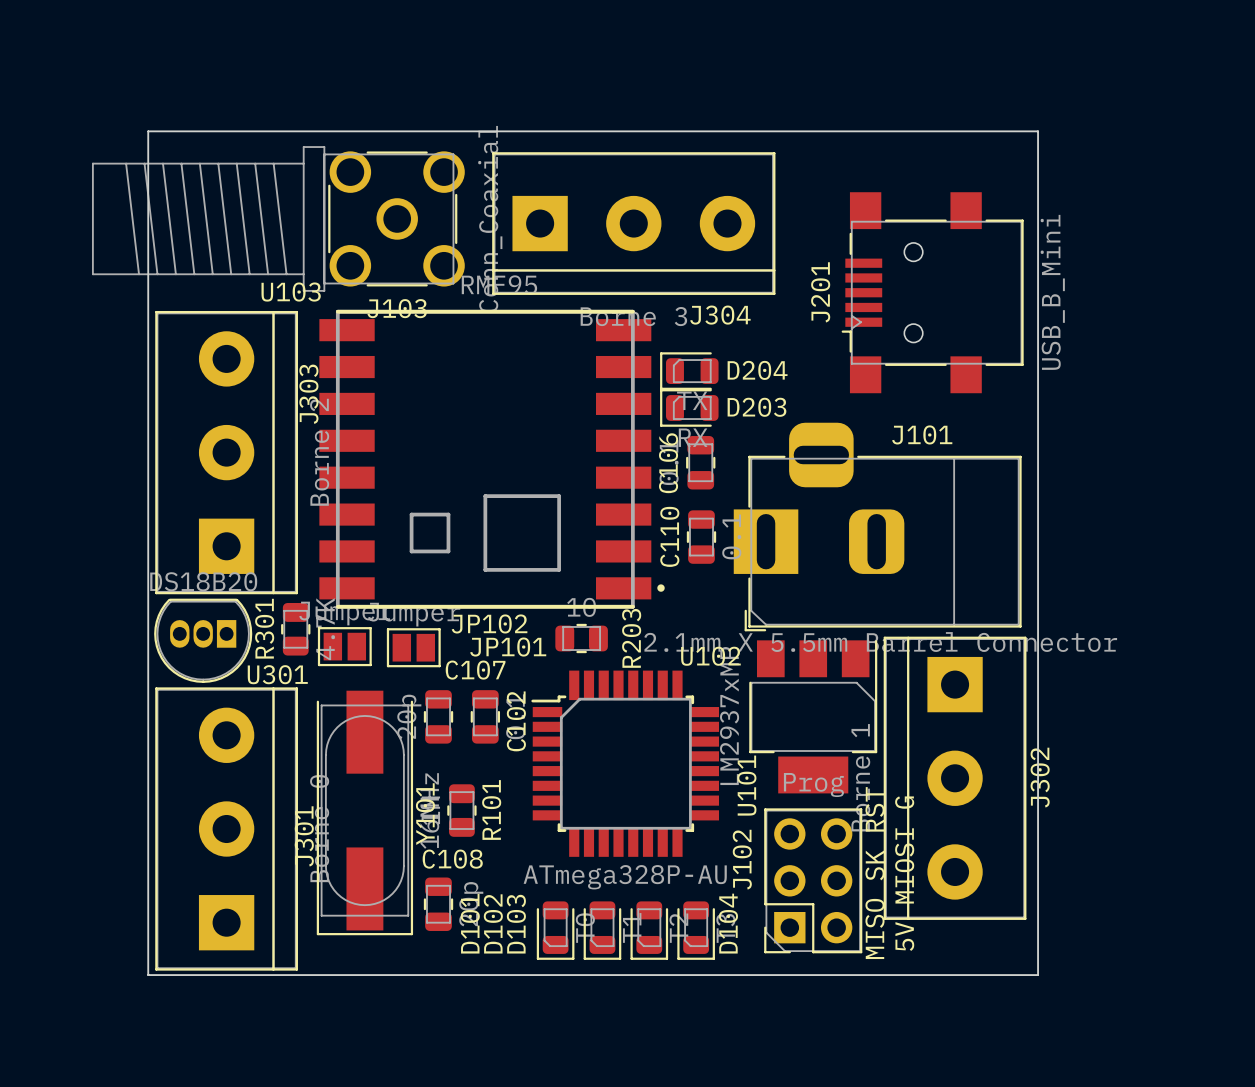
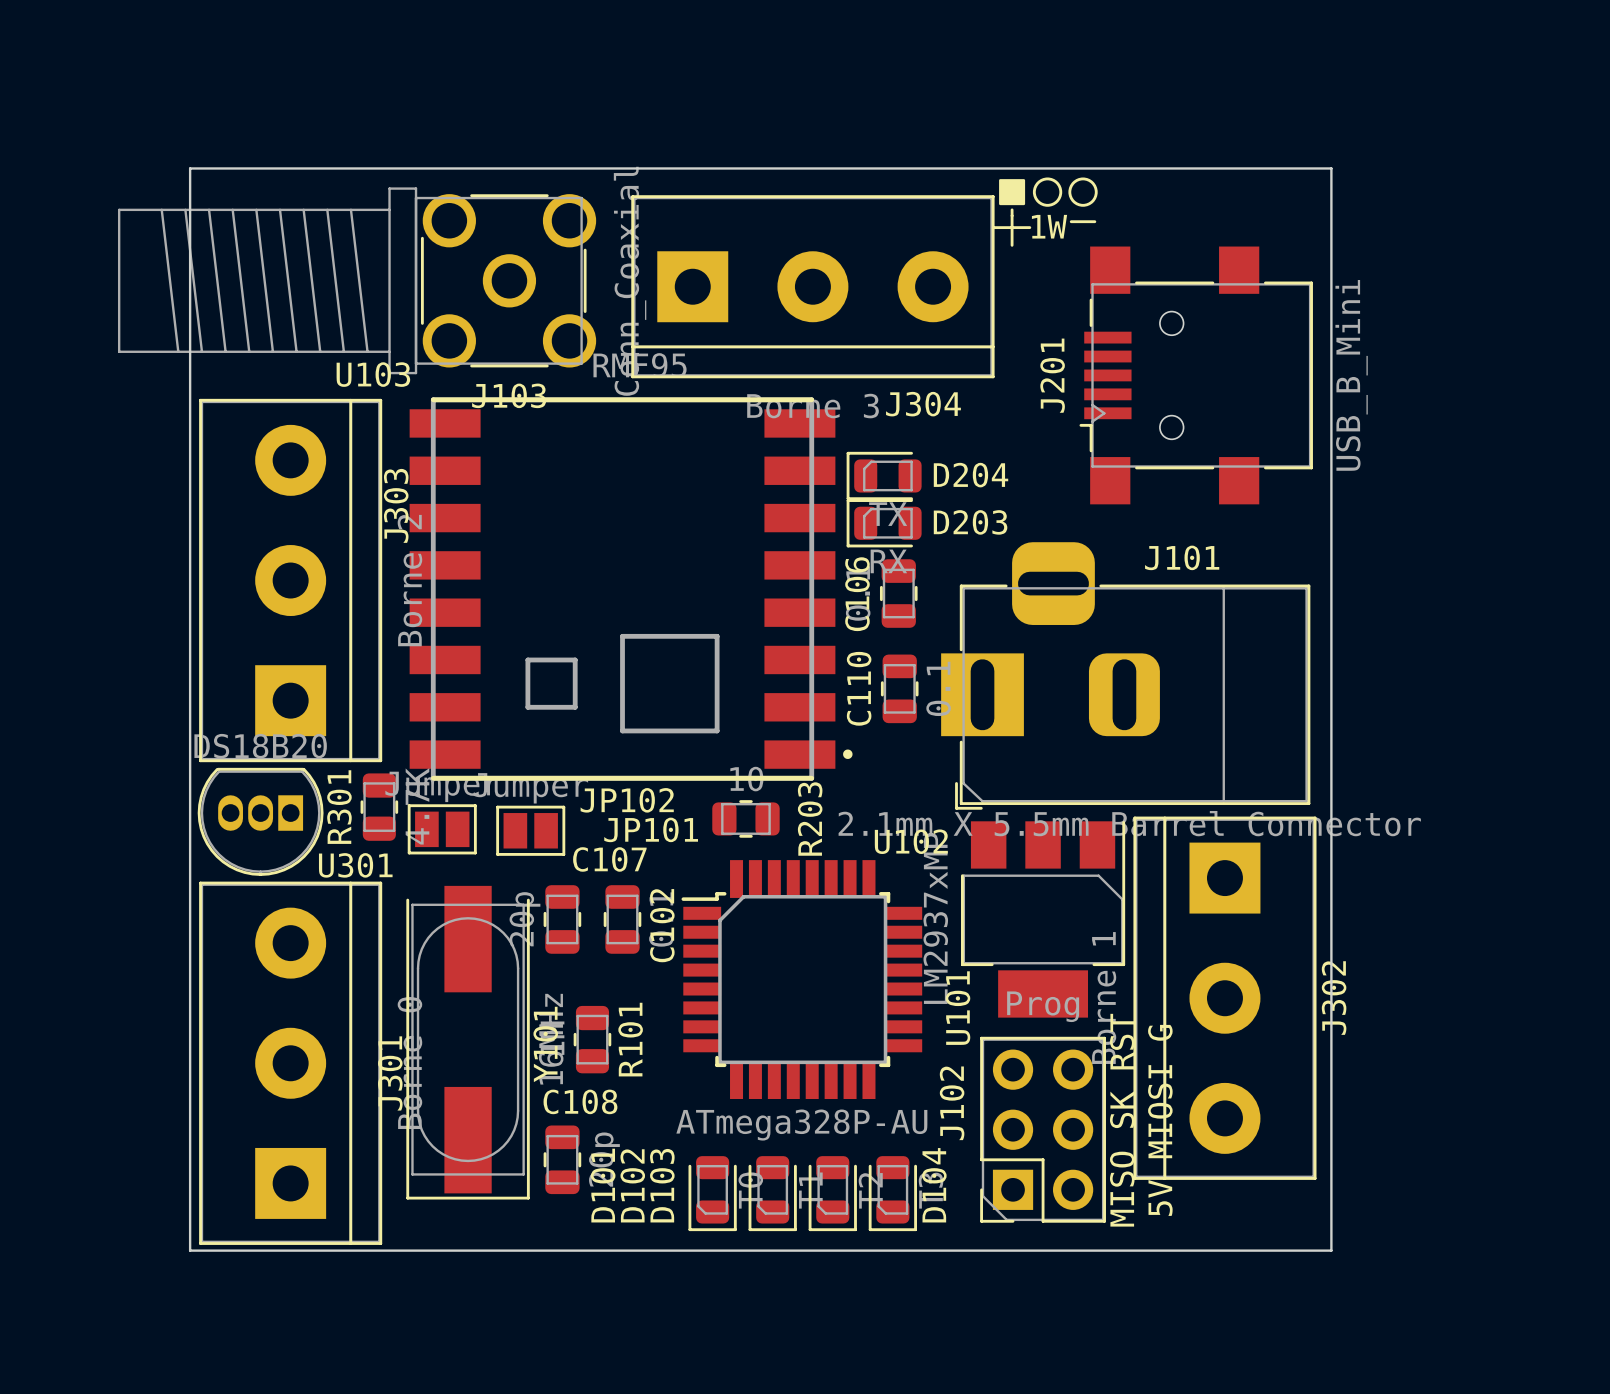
drawing: none -> [999, 177, 1098, 207]
line: none -> (1012, 209) (1012, 245)
line: none -> (1071, 221) (1094, 221)
text: none -> 1W (1049, 226)
line: none -> (994, 227) (1029, 227)

